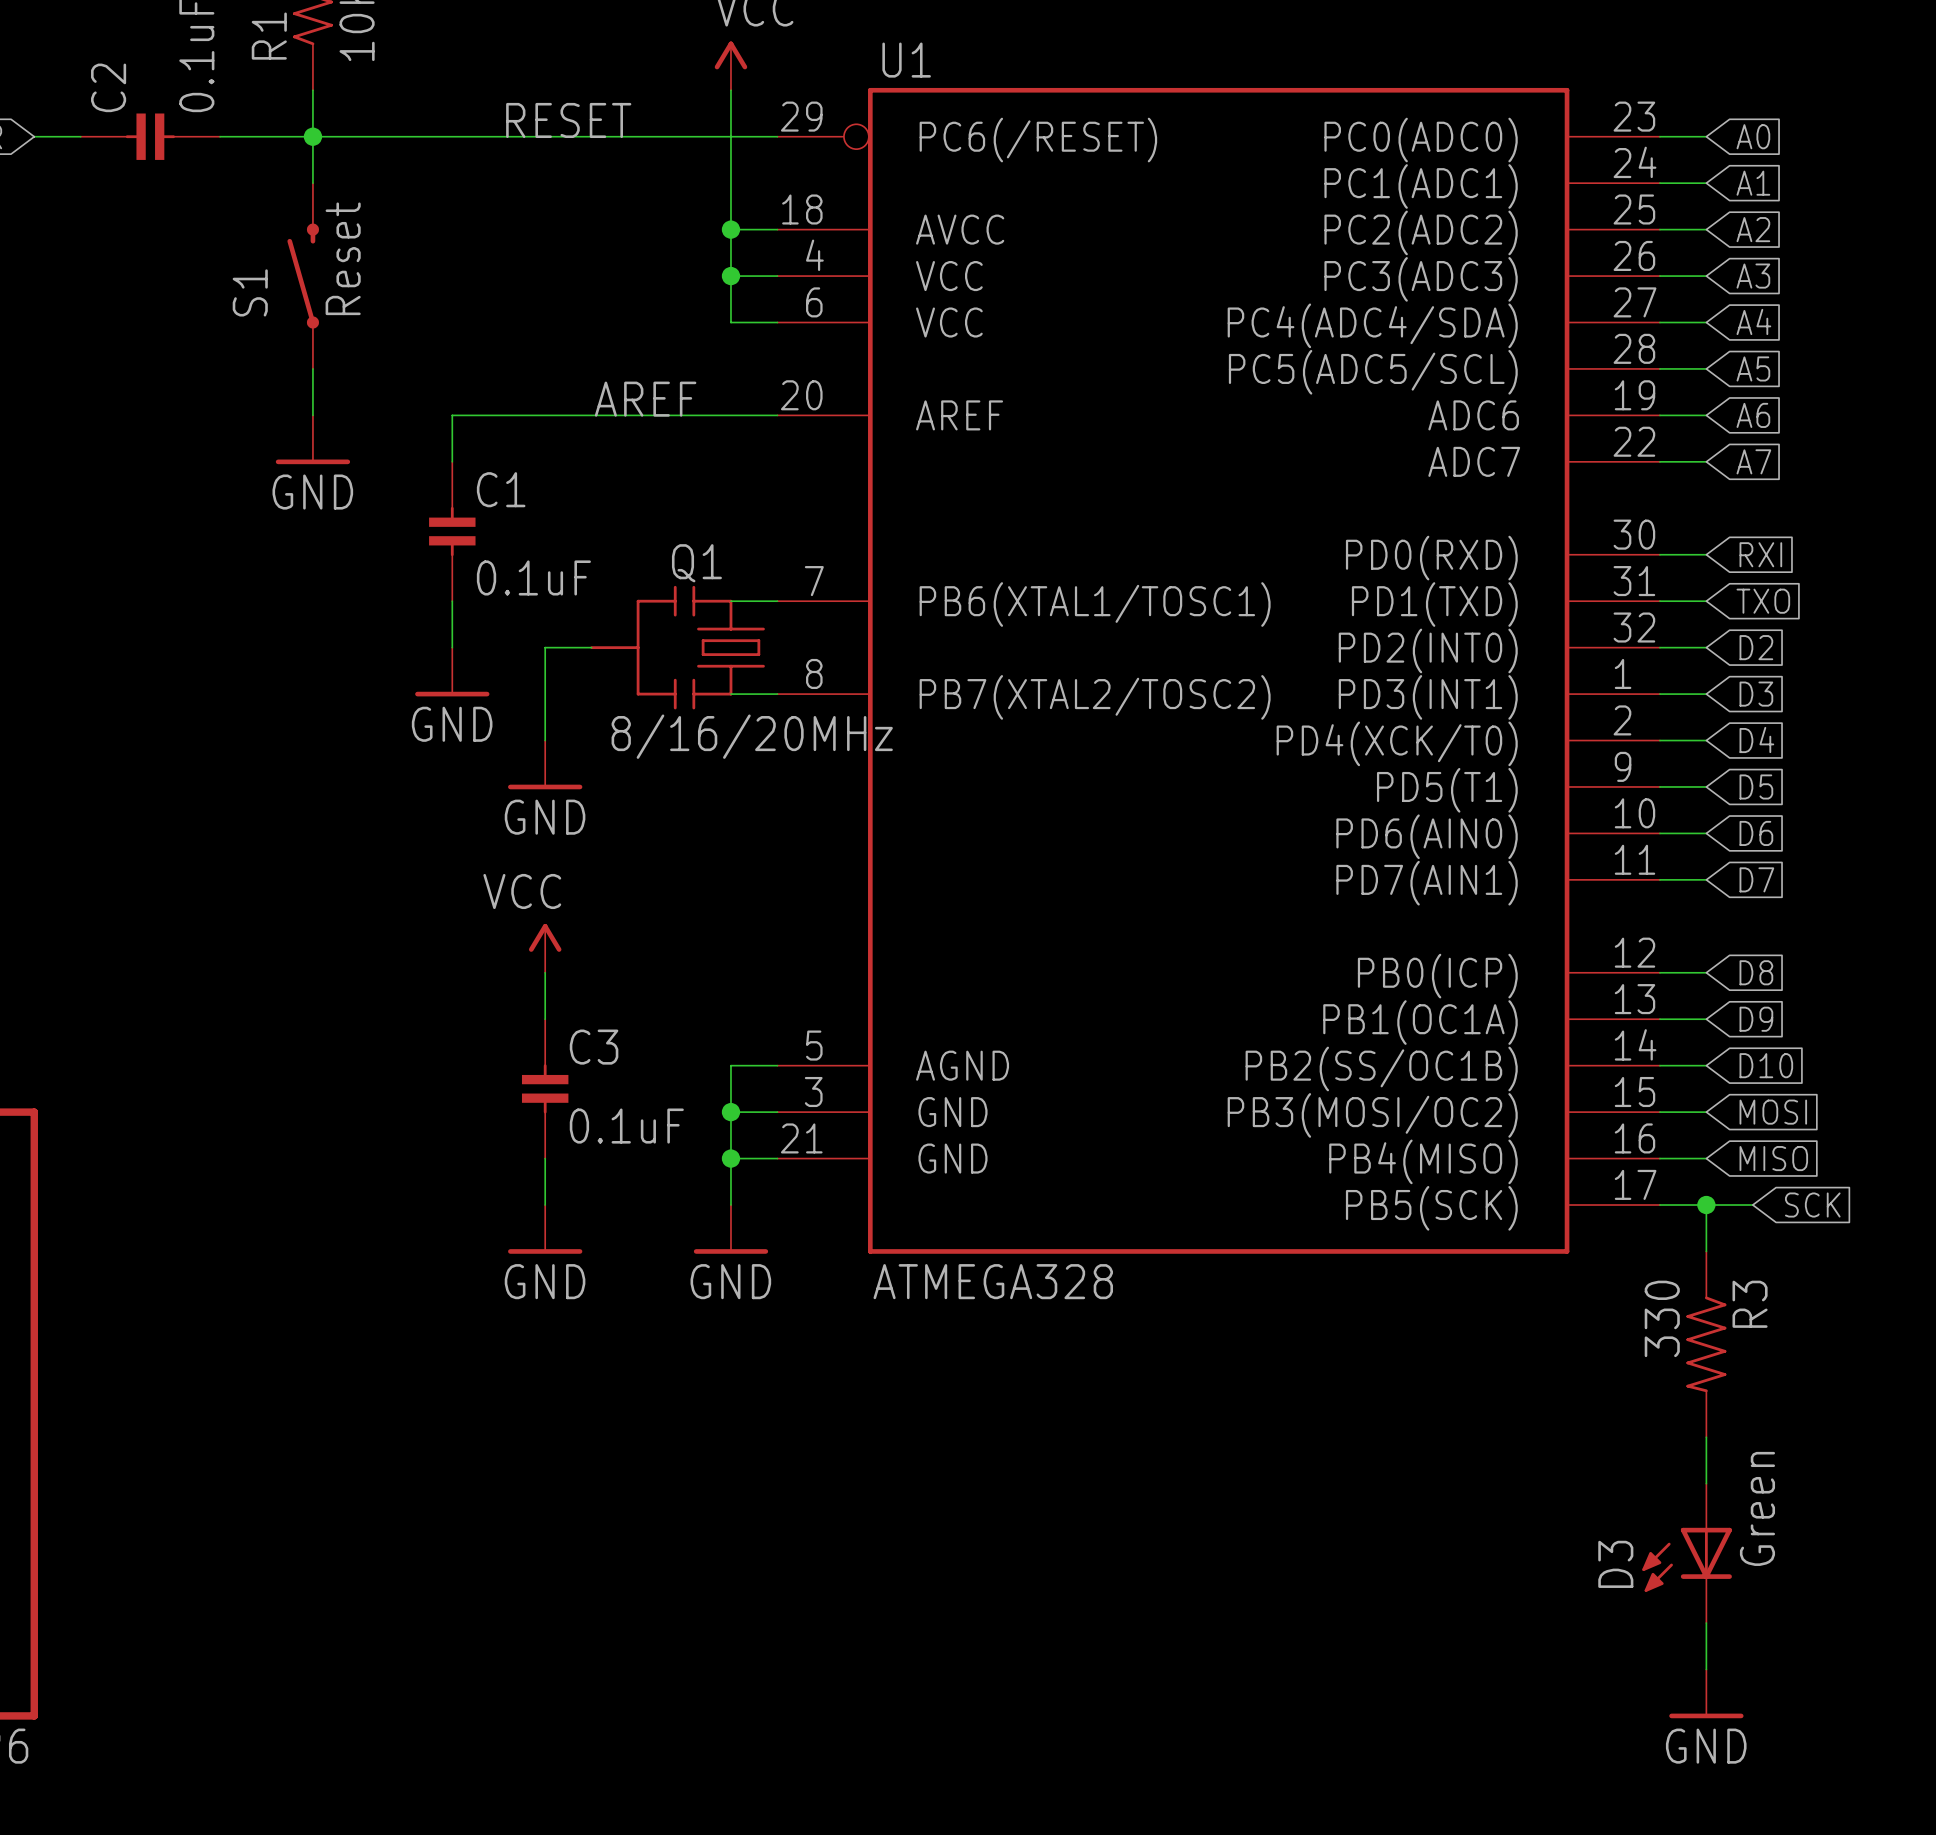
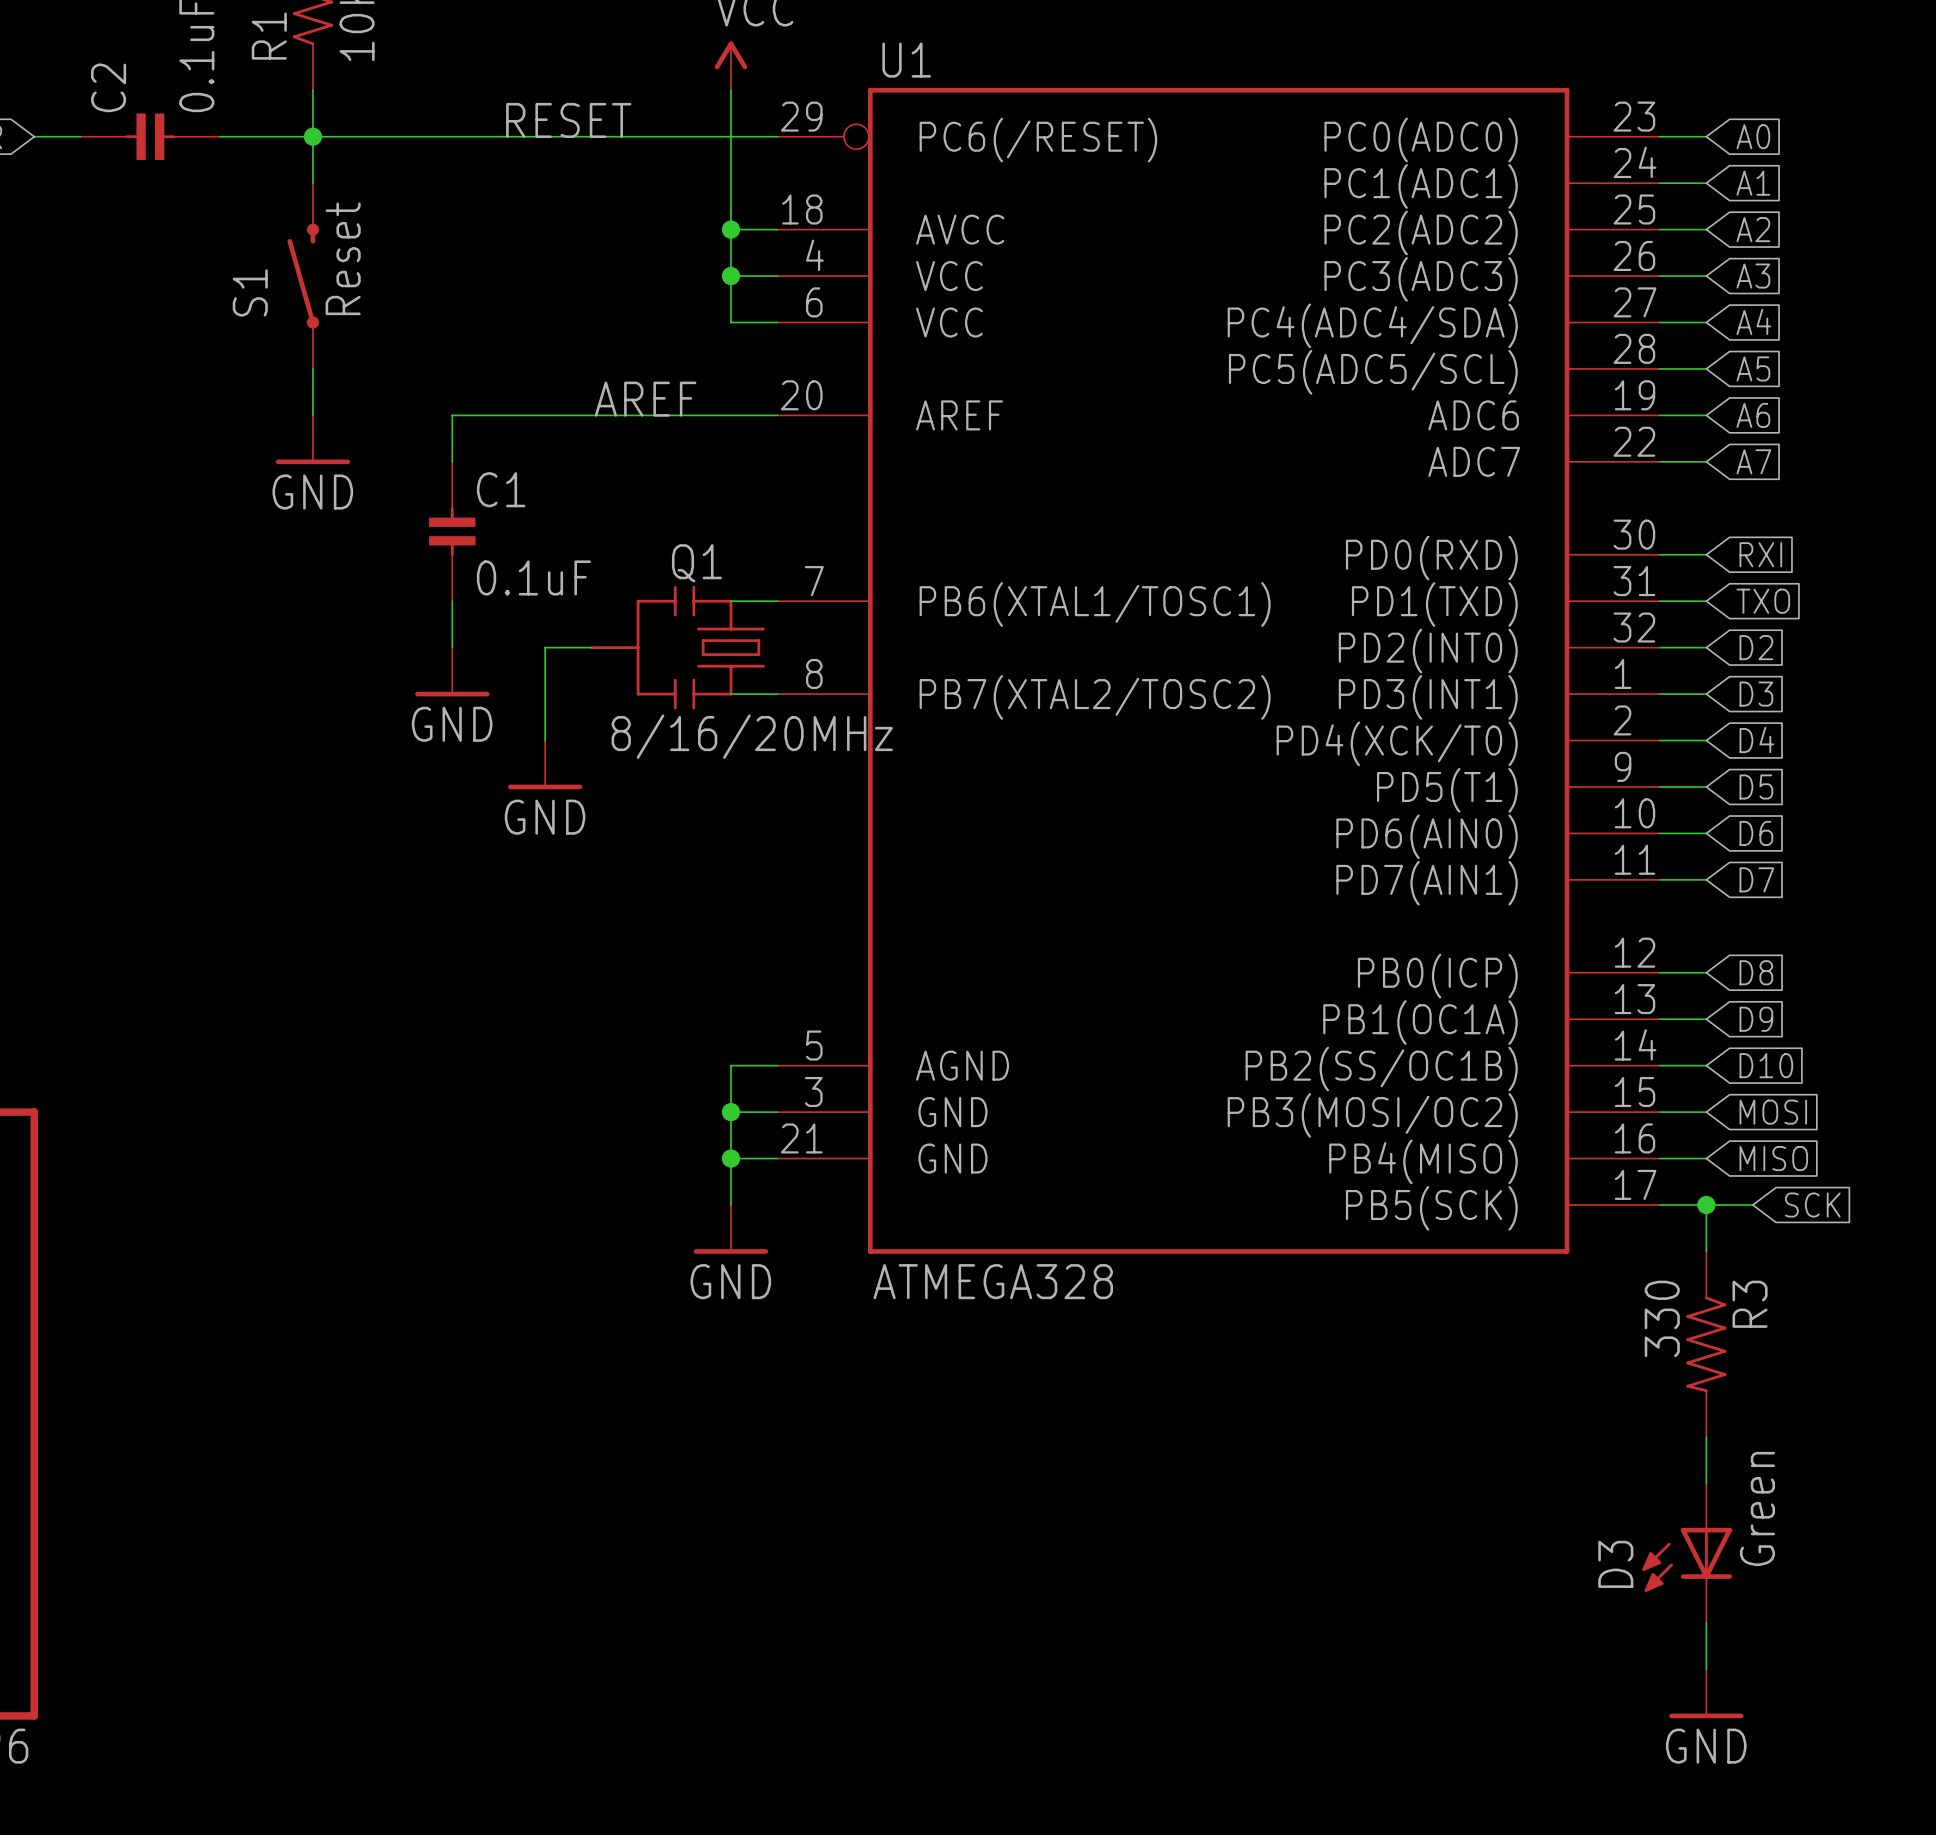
power symbol: VCC (545, 948) -> none
wire: (545, 972) (545, 1019) -> none
C3: 0.1uF (545, 1088) -> none
wire: (545, 1158) (545, 1205) -> none
power symbol: GND (545, 1229) -> none

